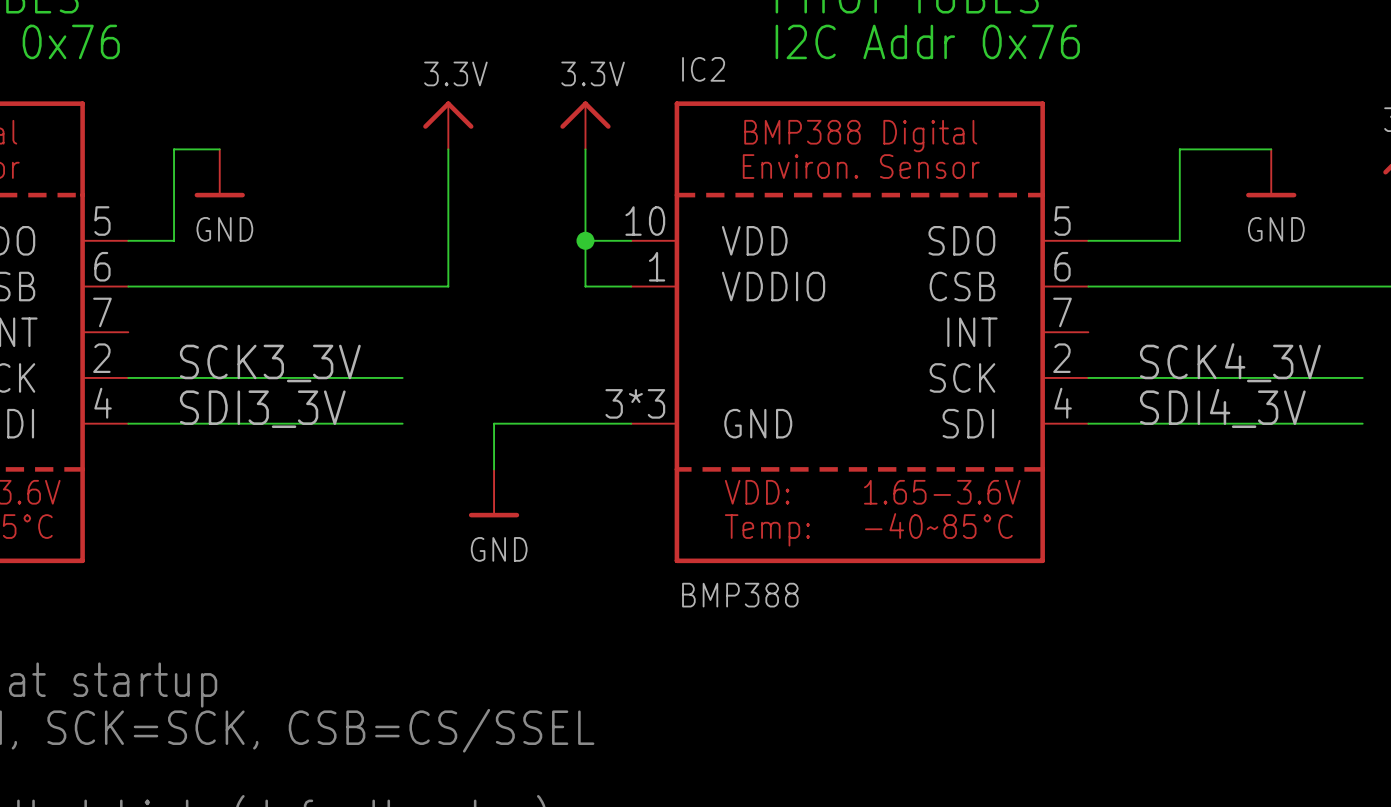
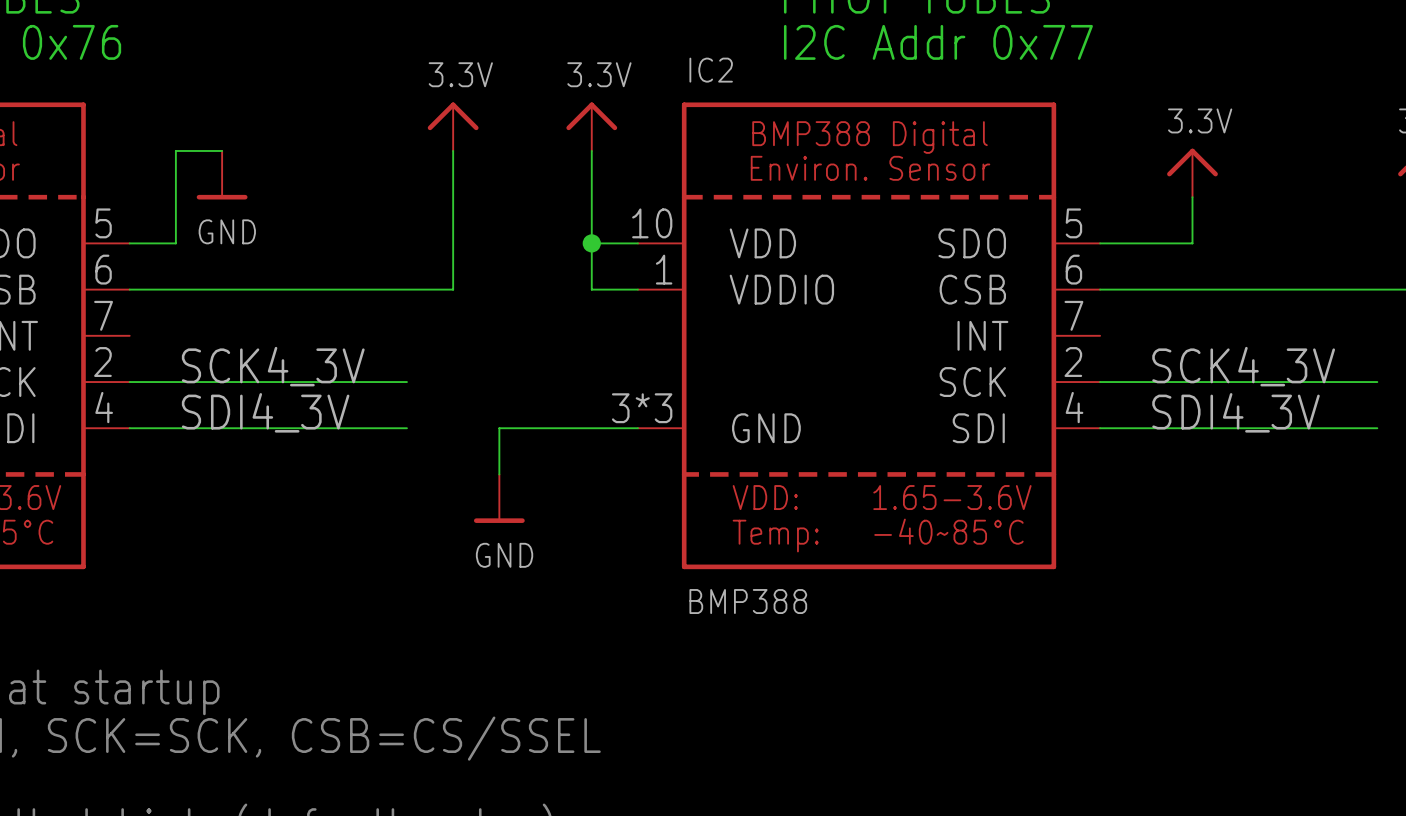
text: I2C Addr 0x76 (927, 41) -> I2C Addr 0x77 (938, 42)
wire: (1271, 149) (1179, 149) (1179, 195) -> none
power symbol: none -> 3.3V (1192, 172)
power symbol: GND (1271, 173) -> none
label: SCK3_3V (270, 363) -> SCK4_3V (273, 366)
label: SDI3_3V (262, 409) -> SDI4_3V (265, 412)

